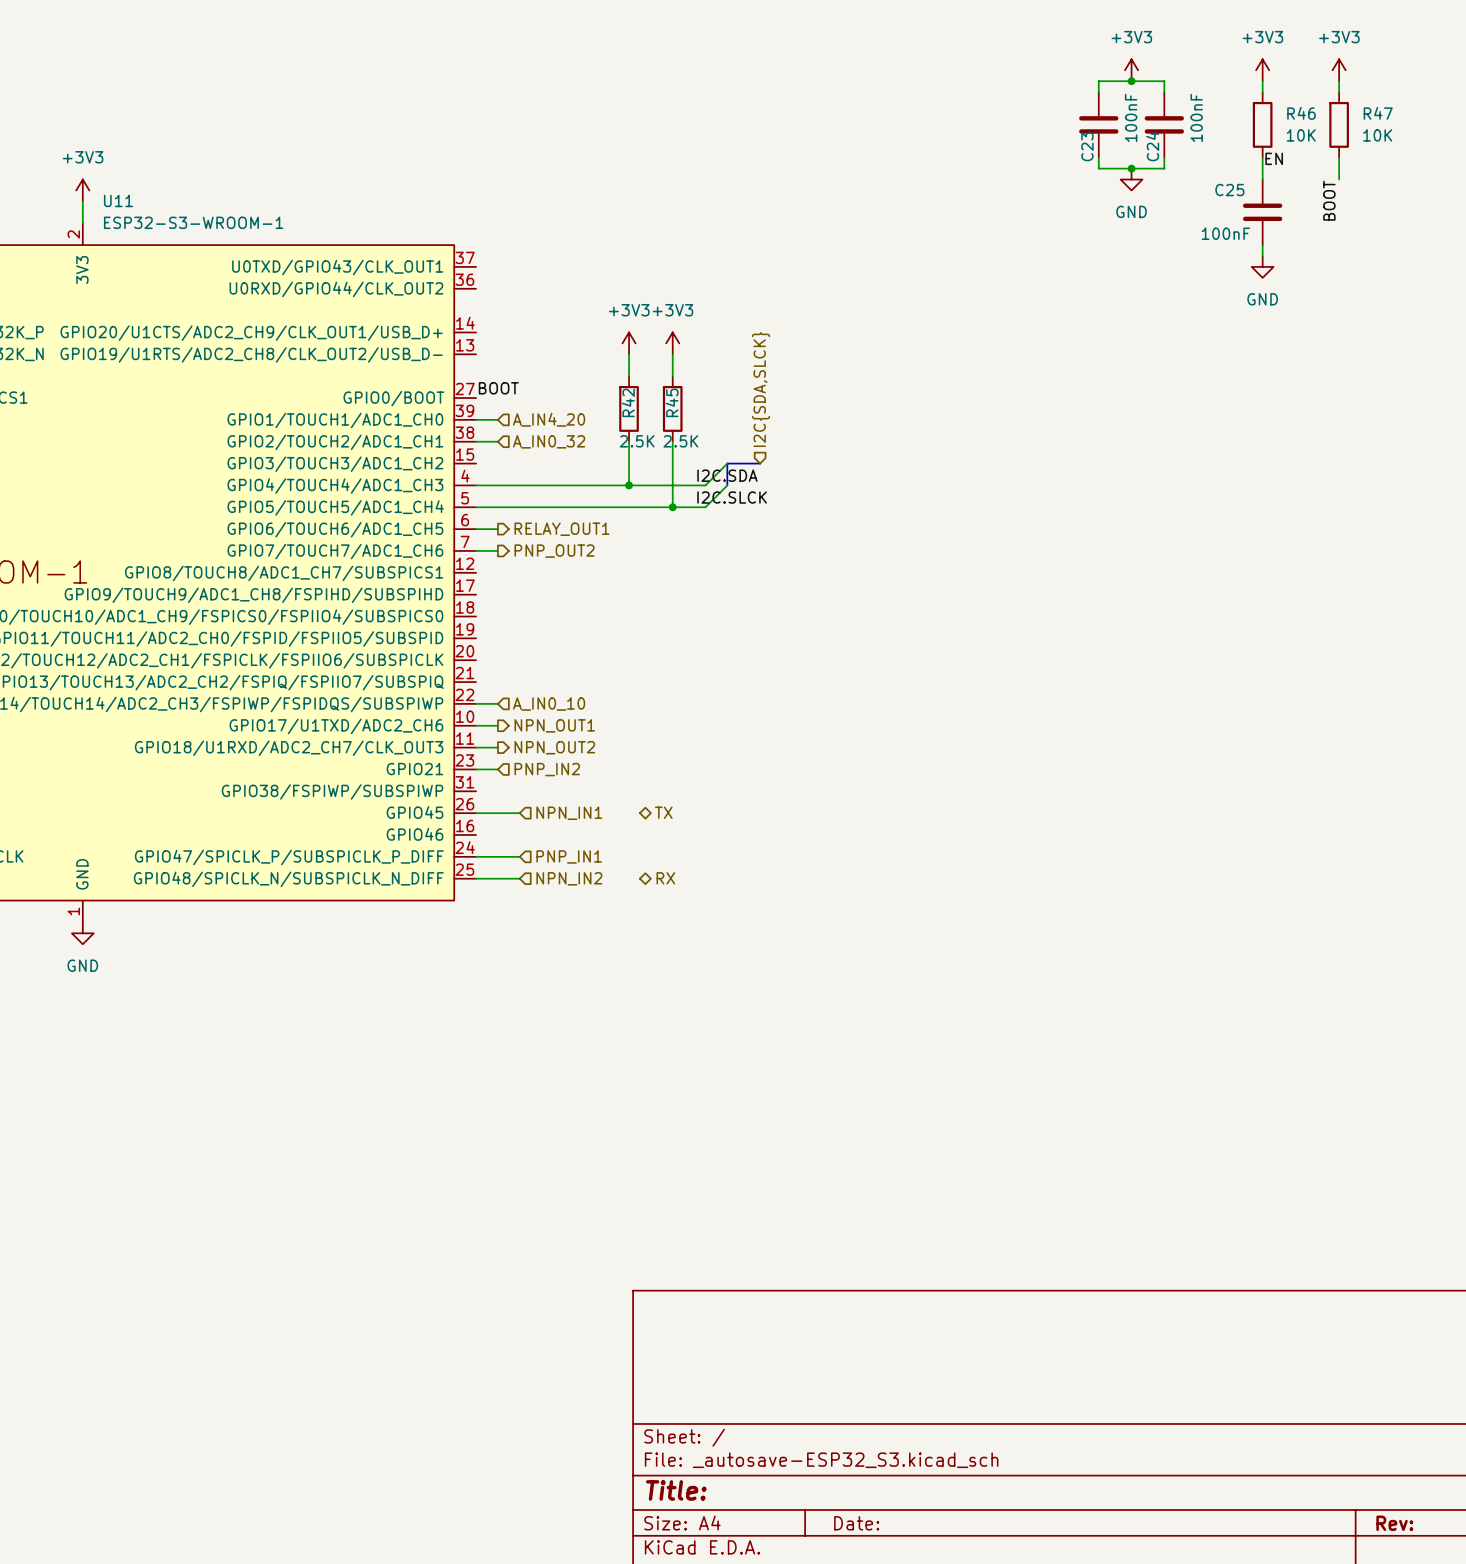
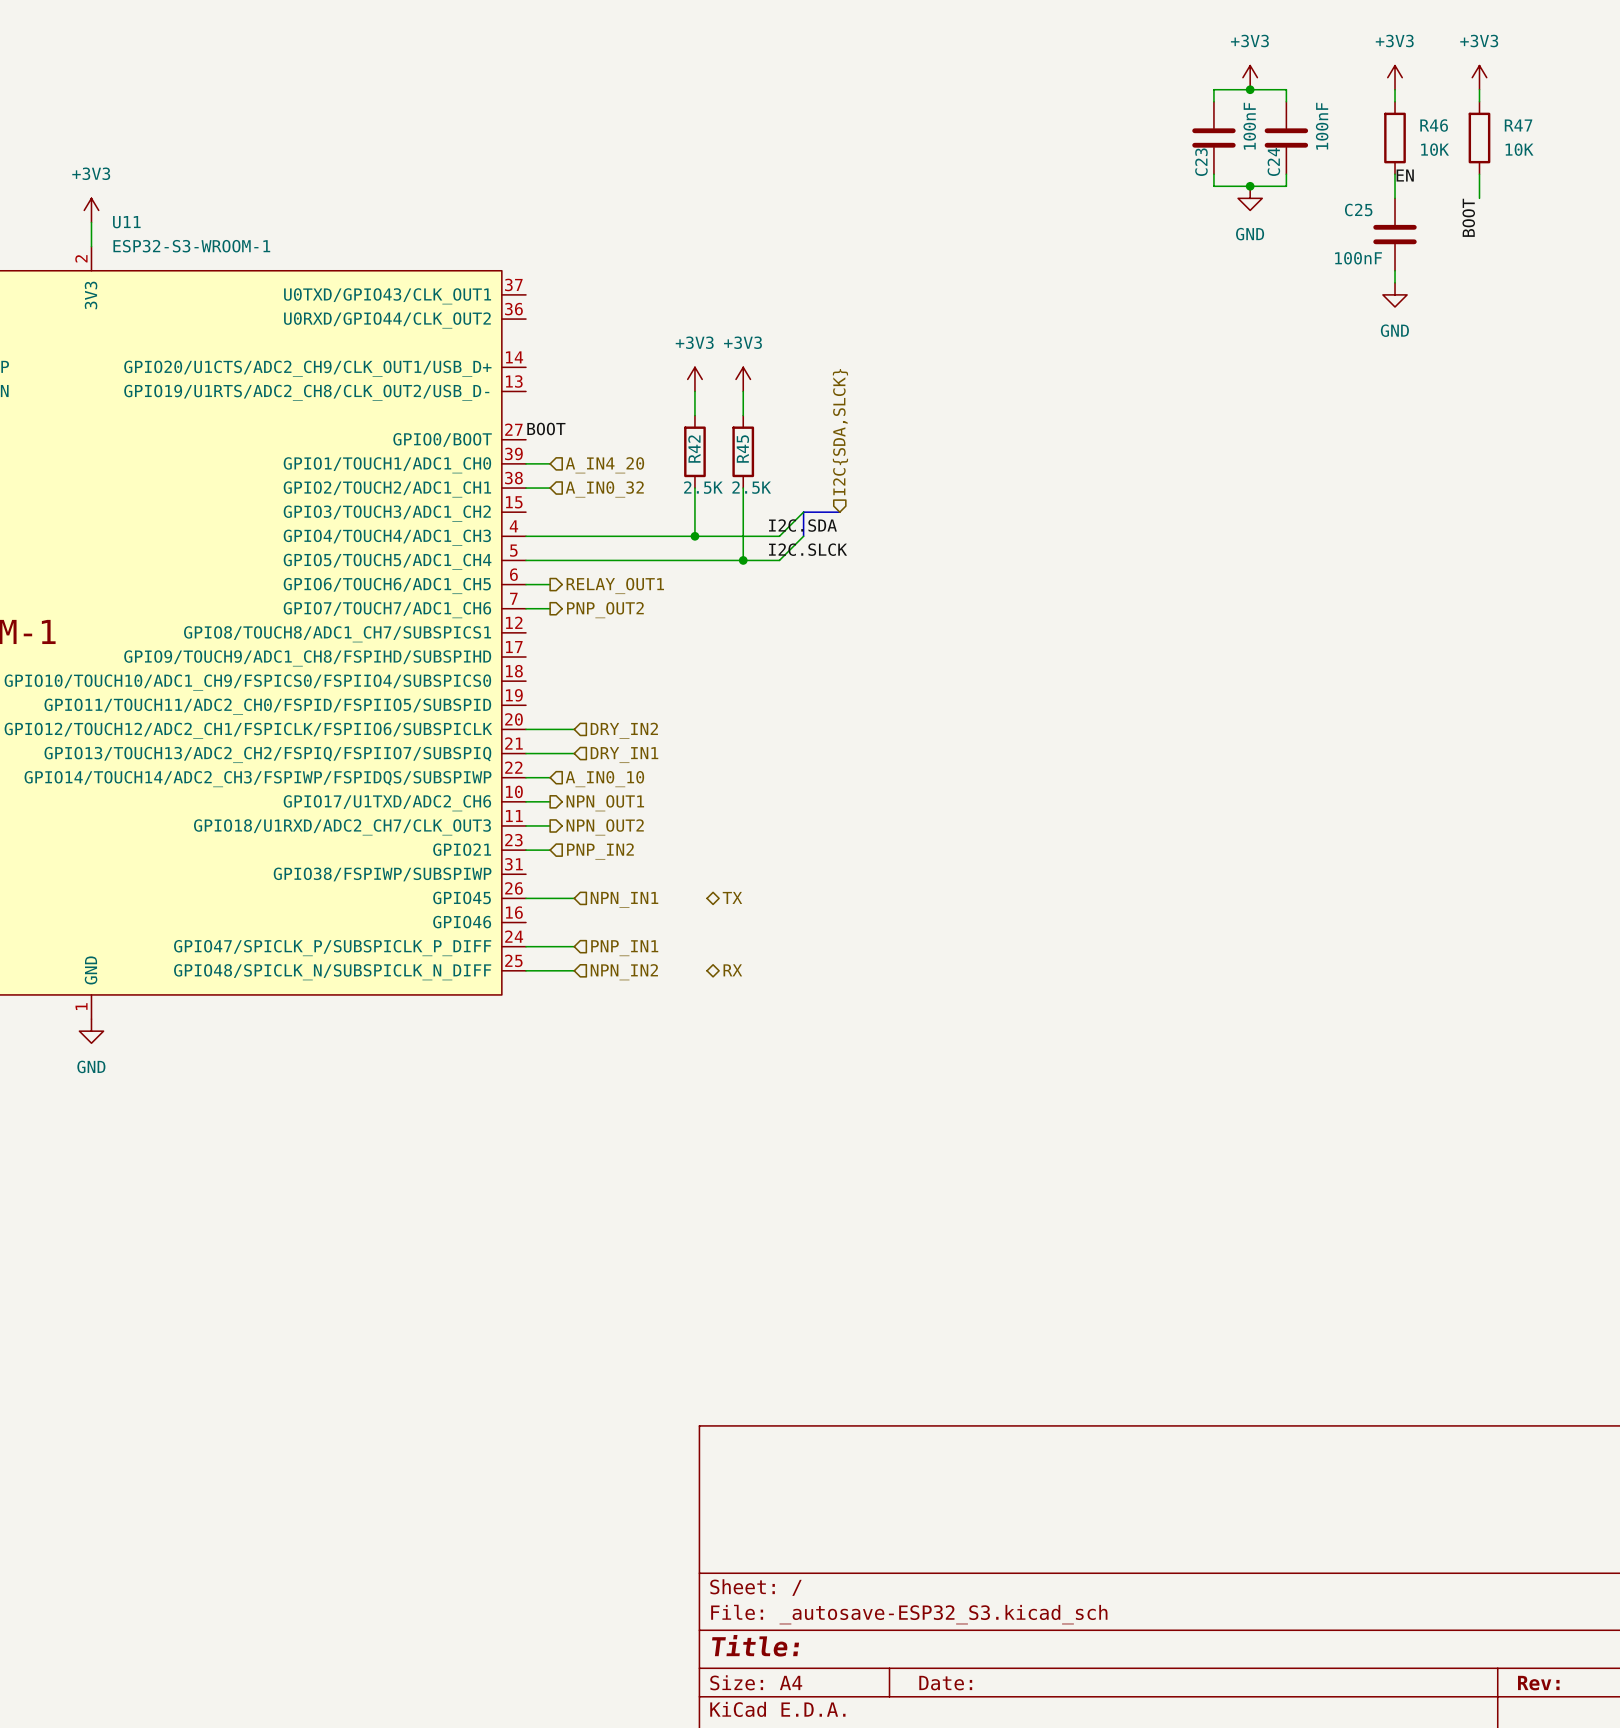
wire: none -> (525, 729) (574, 729)
hierarchical label: none -> DRY_IN2 (624, 730)
wire: none -> (525, 753) (574, 753)
hierarchical label: none -> DRY_IN1 (624, 755)

